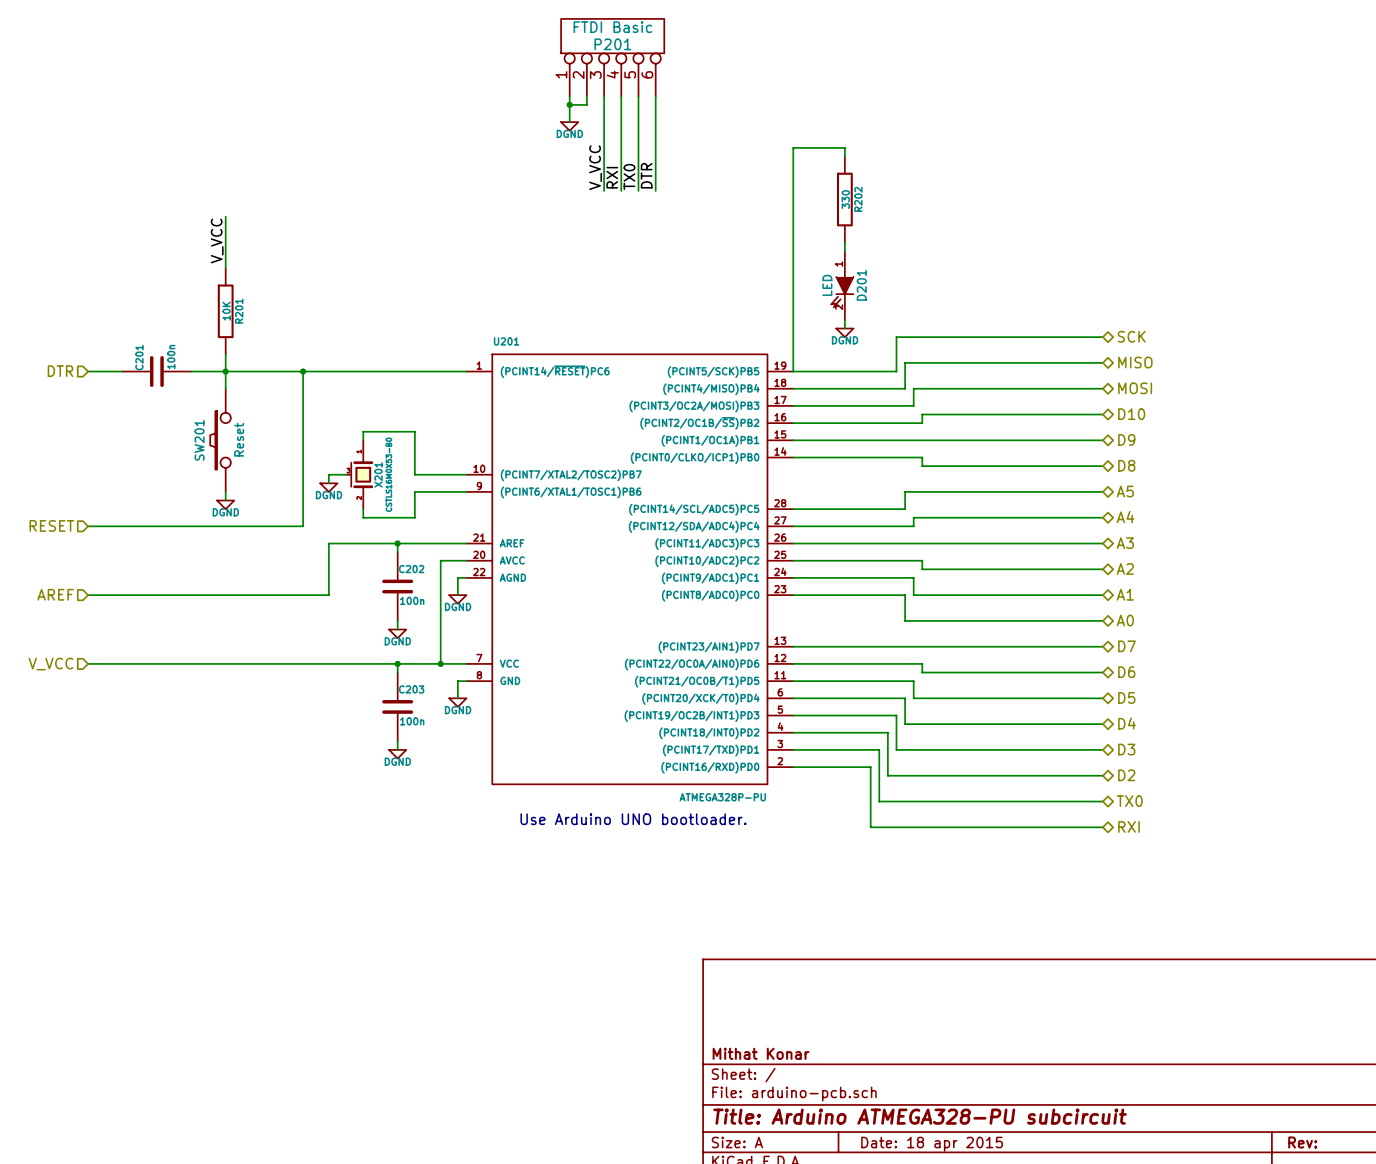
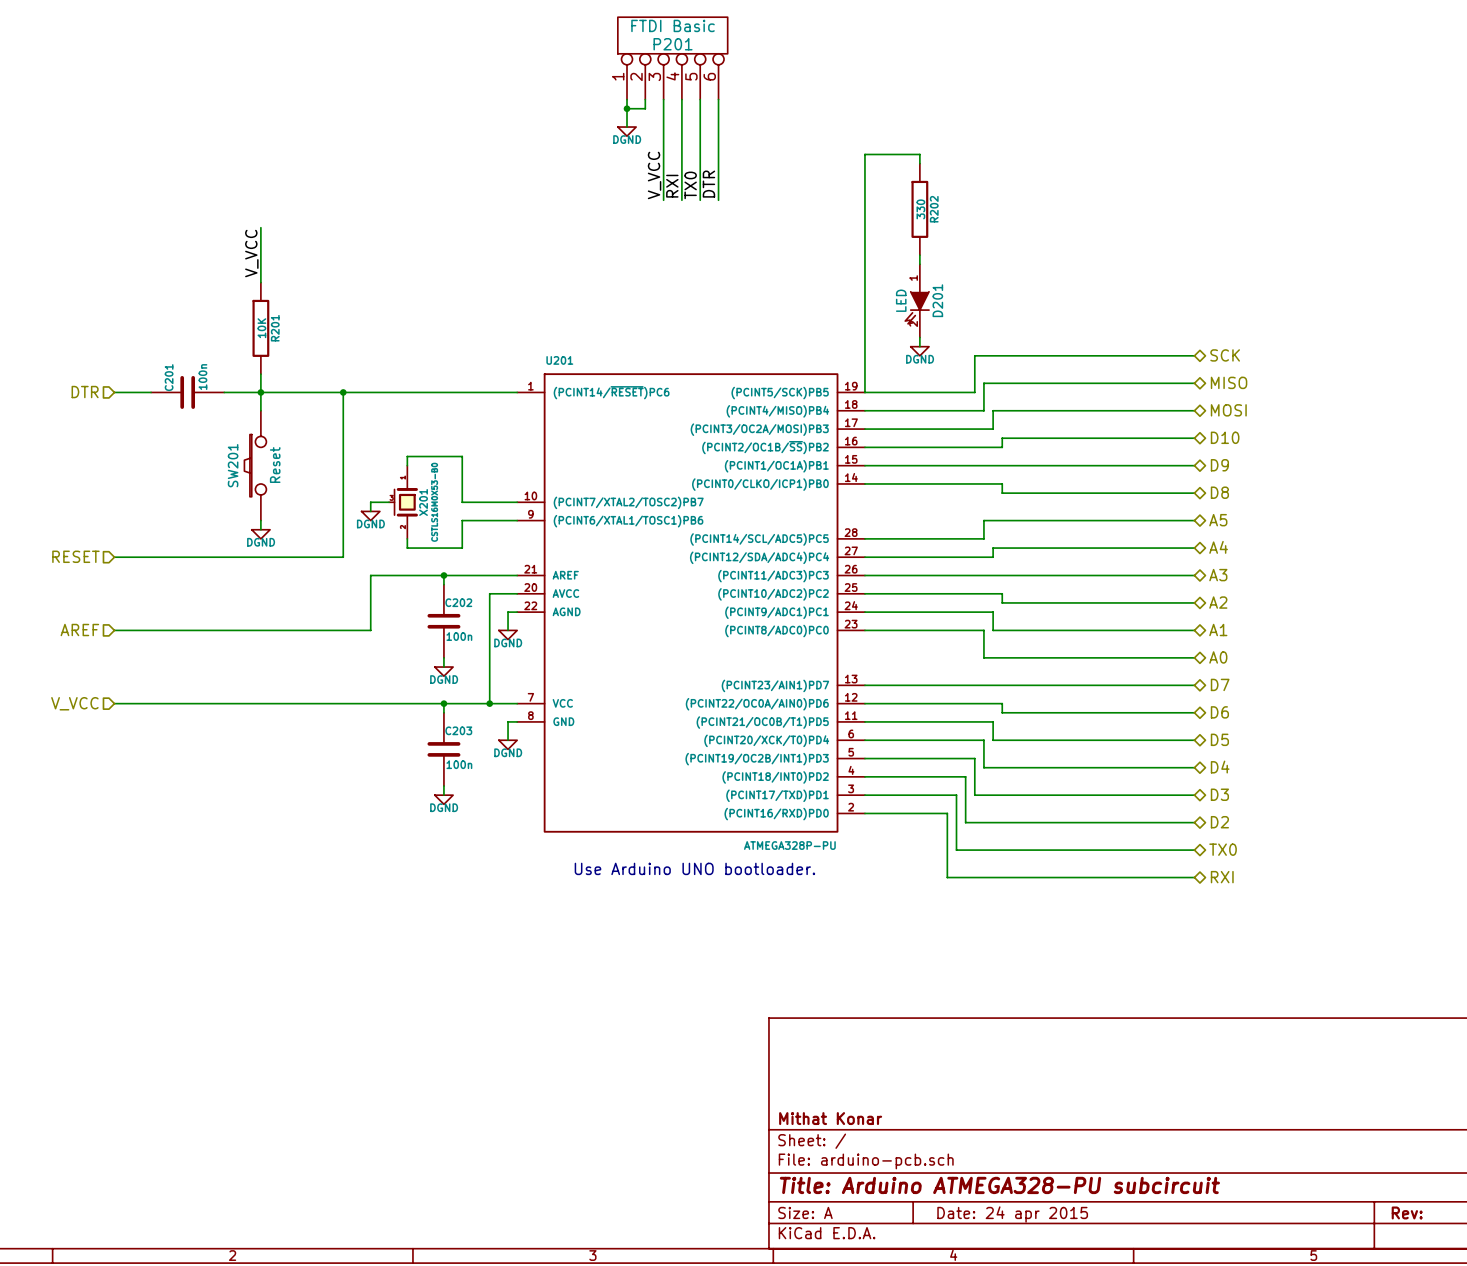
title block: Date: 18 apr 2015 (932, 1144) -> Date: 24 apr 2015 (1012, 1214)

